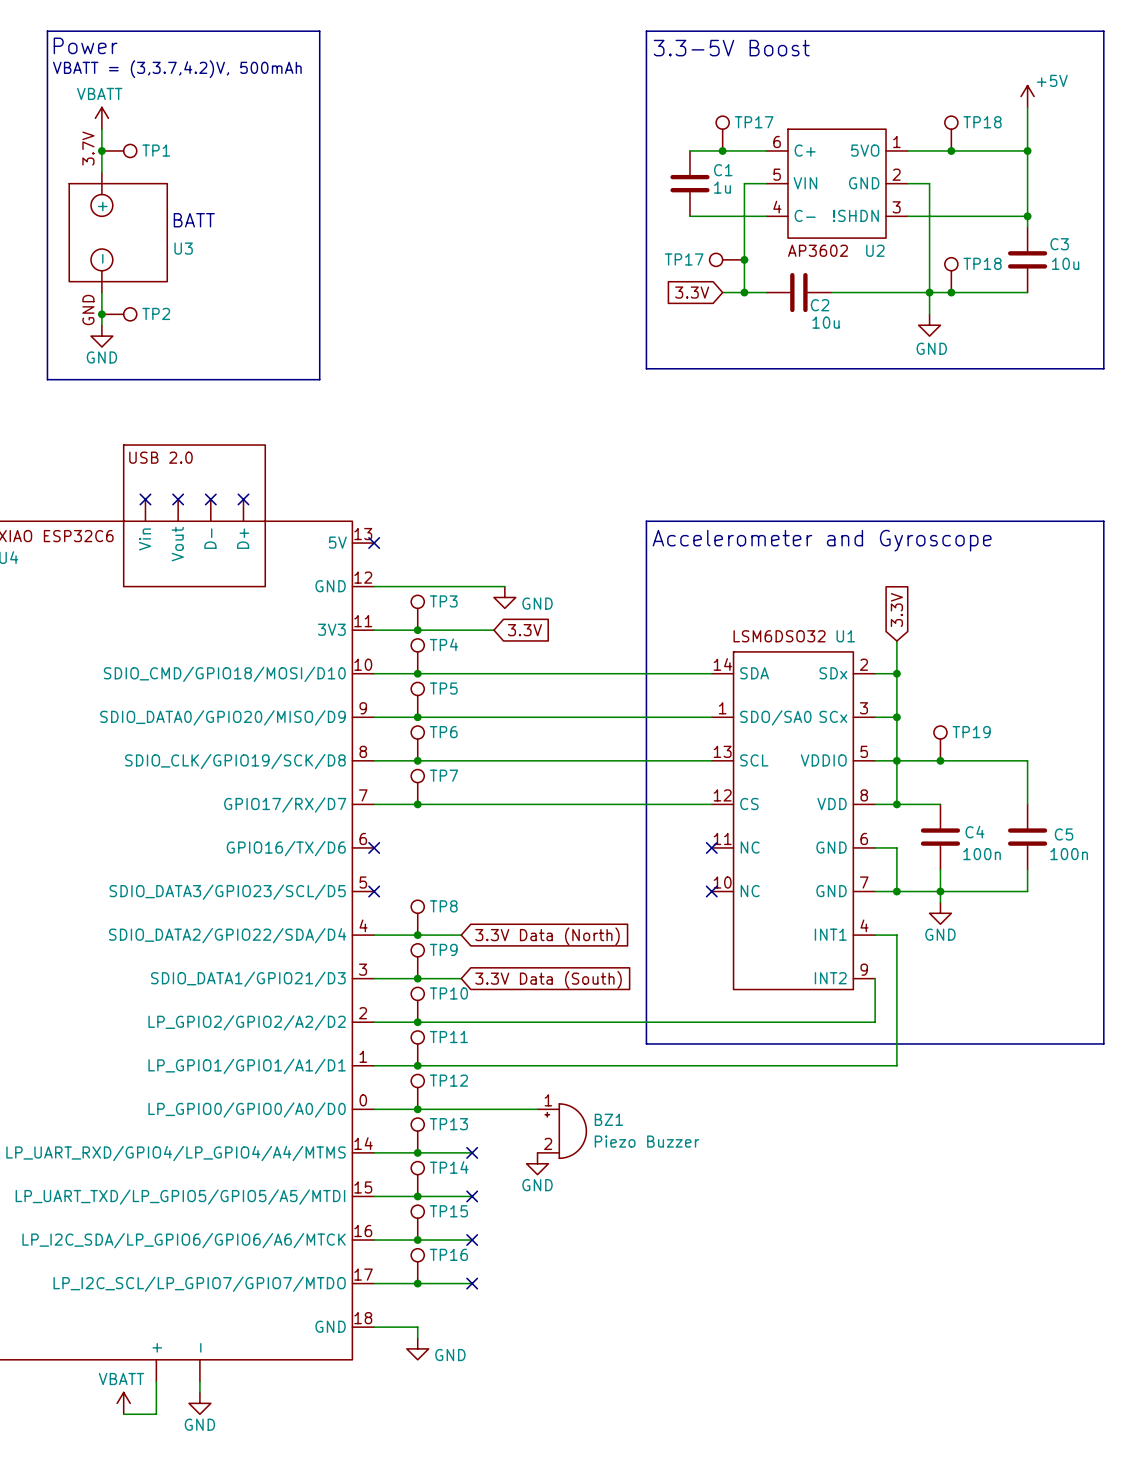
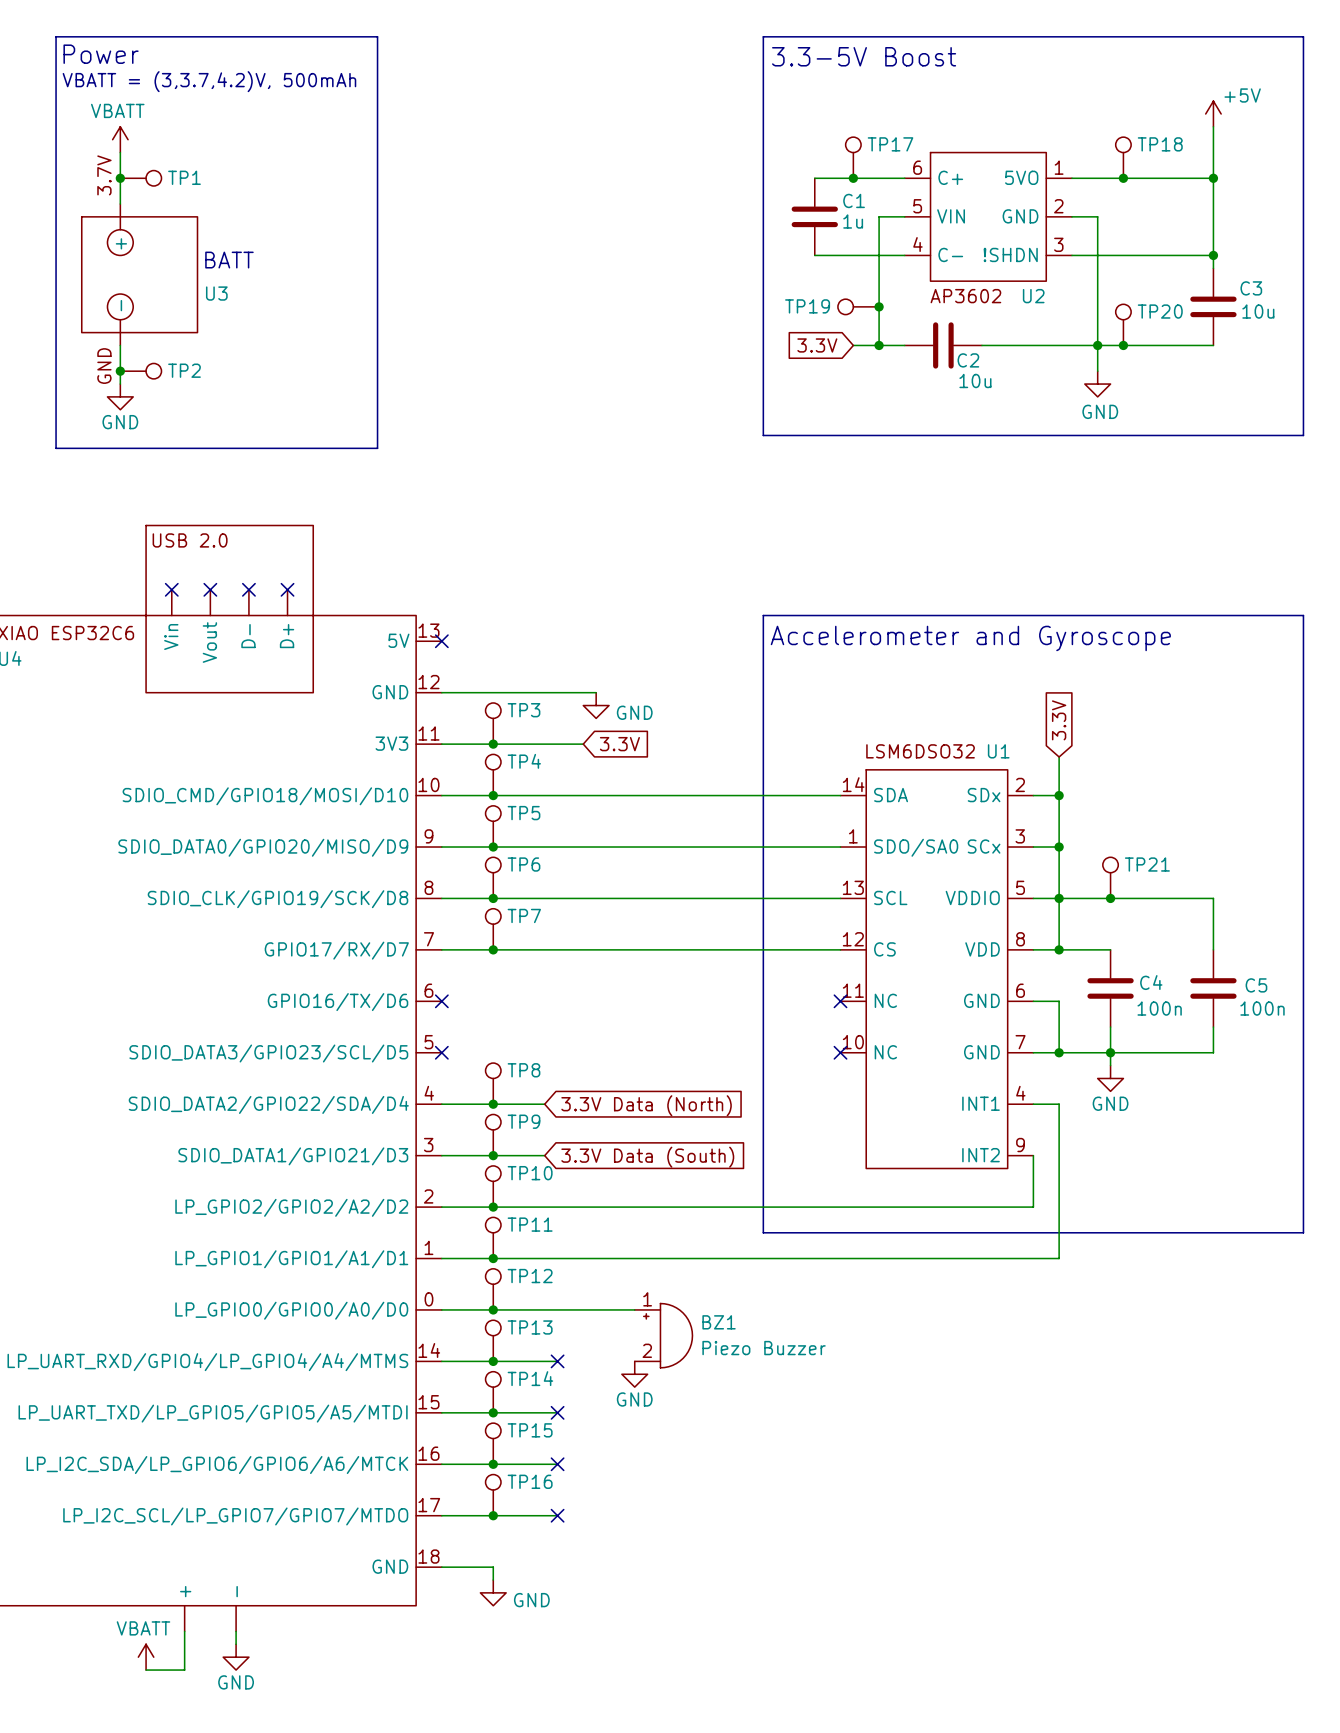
TP17 name: TP17 (684, 259) -> TP19 (807, 306)
TP18 name: TP18 (982, 263) -> TP20 (1160, 311)
TP19 name: TP19 (971, 732) -> TP21 (1147, 864)

